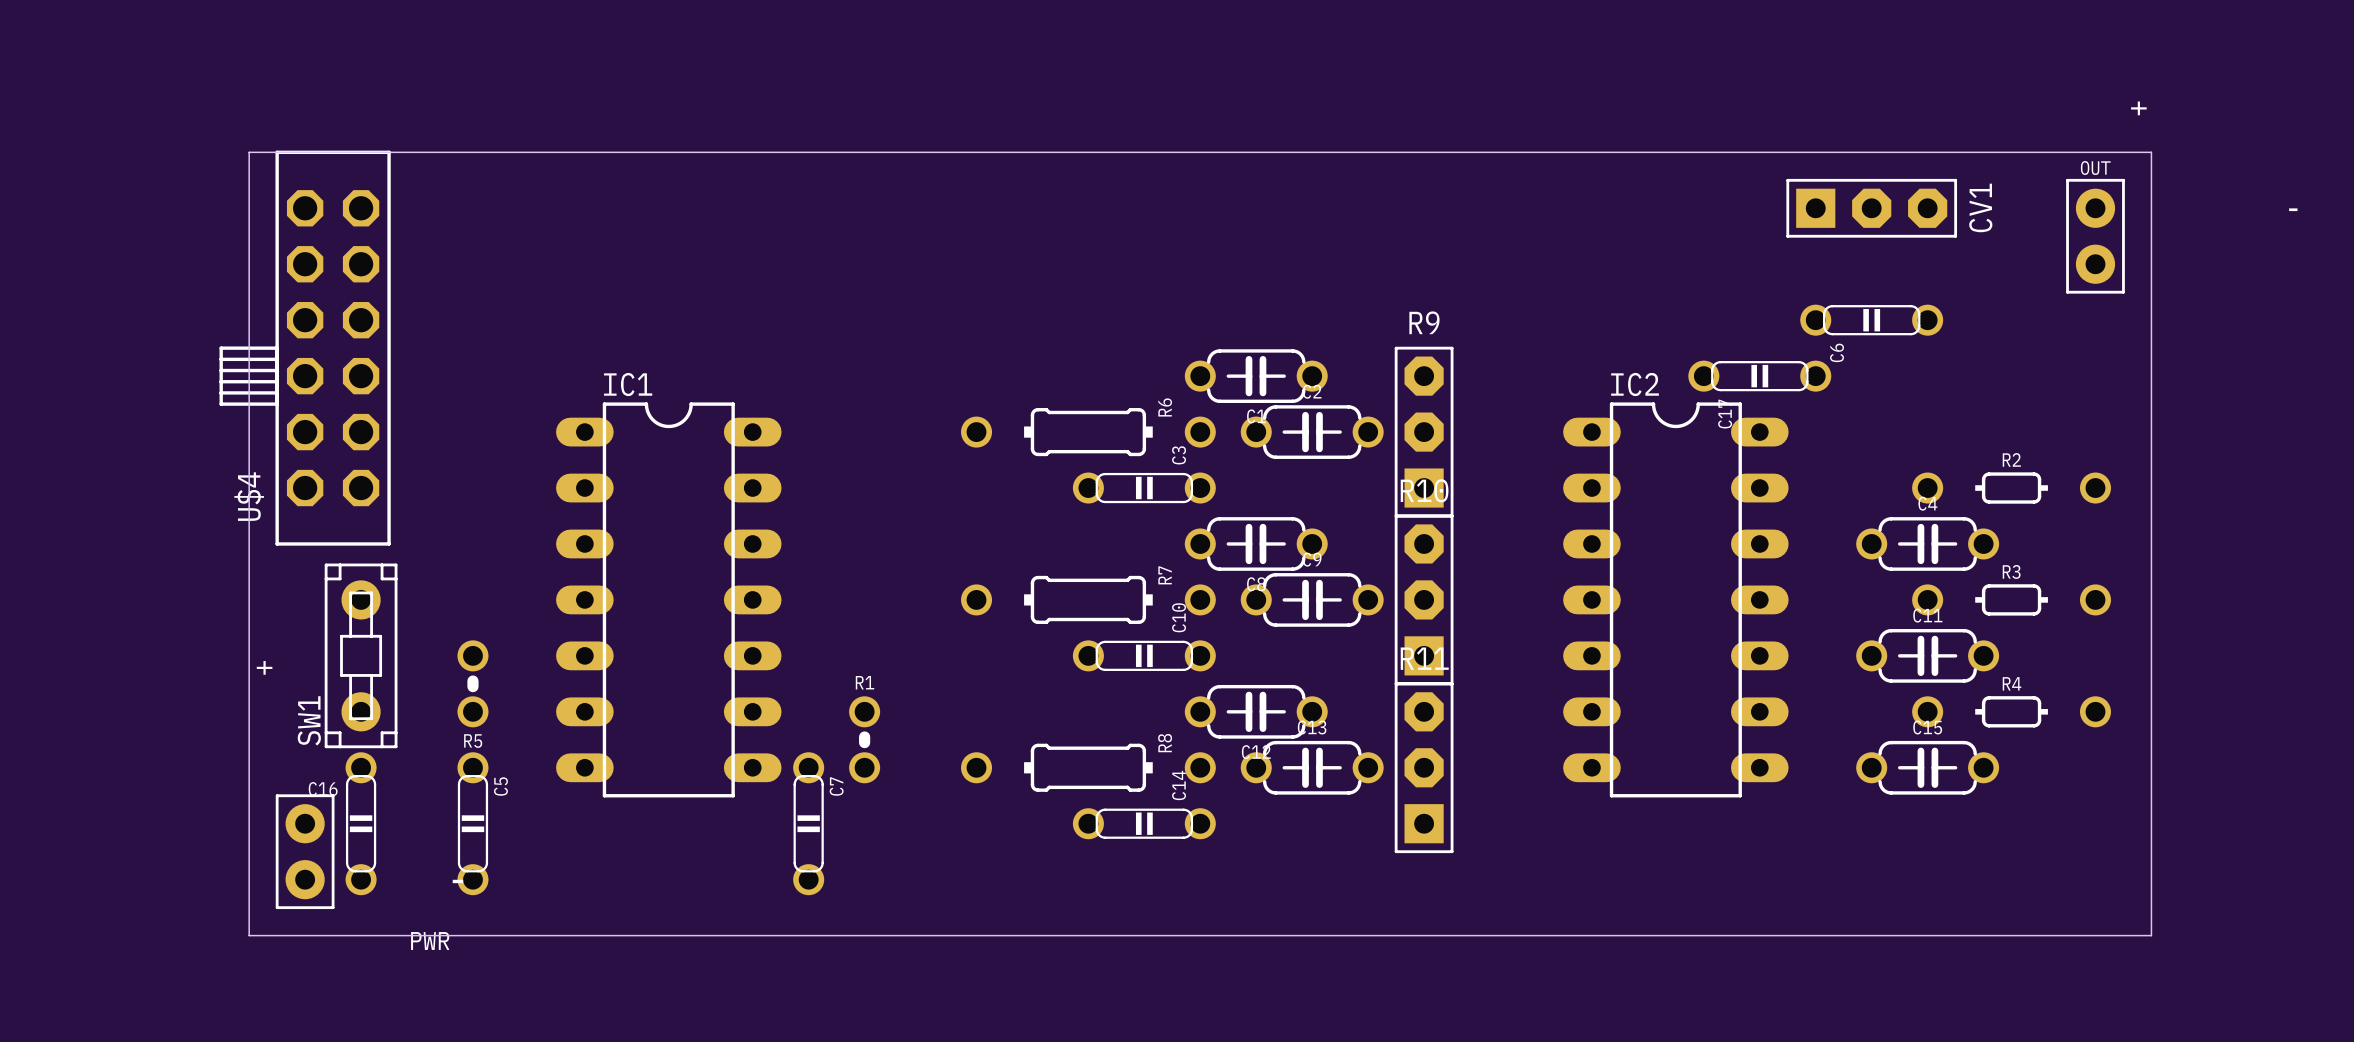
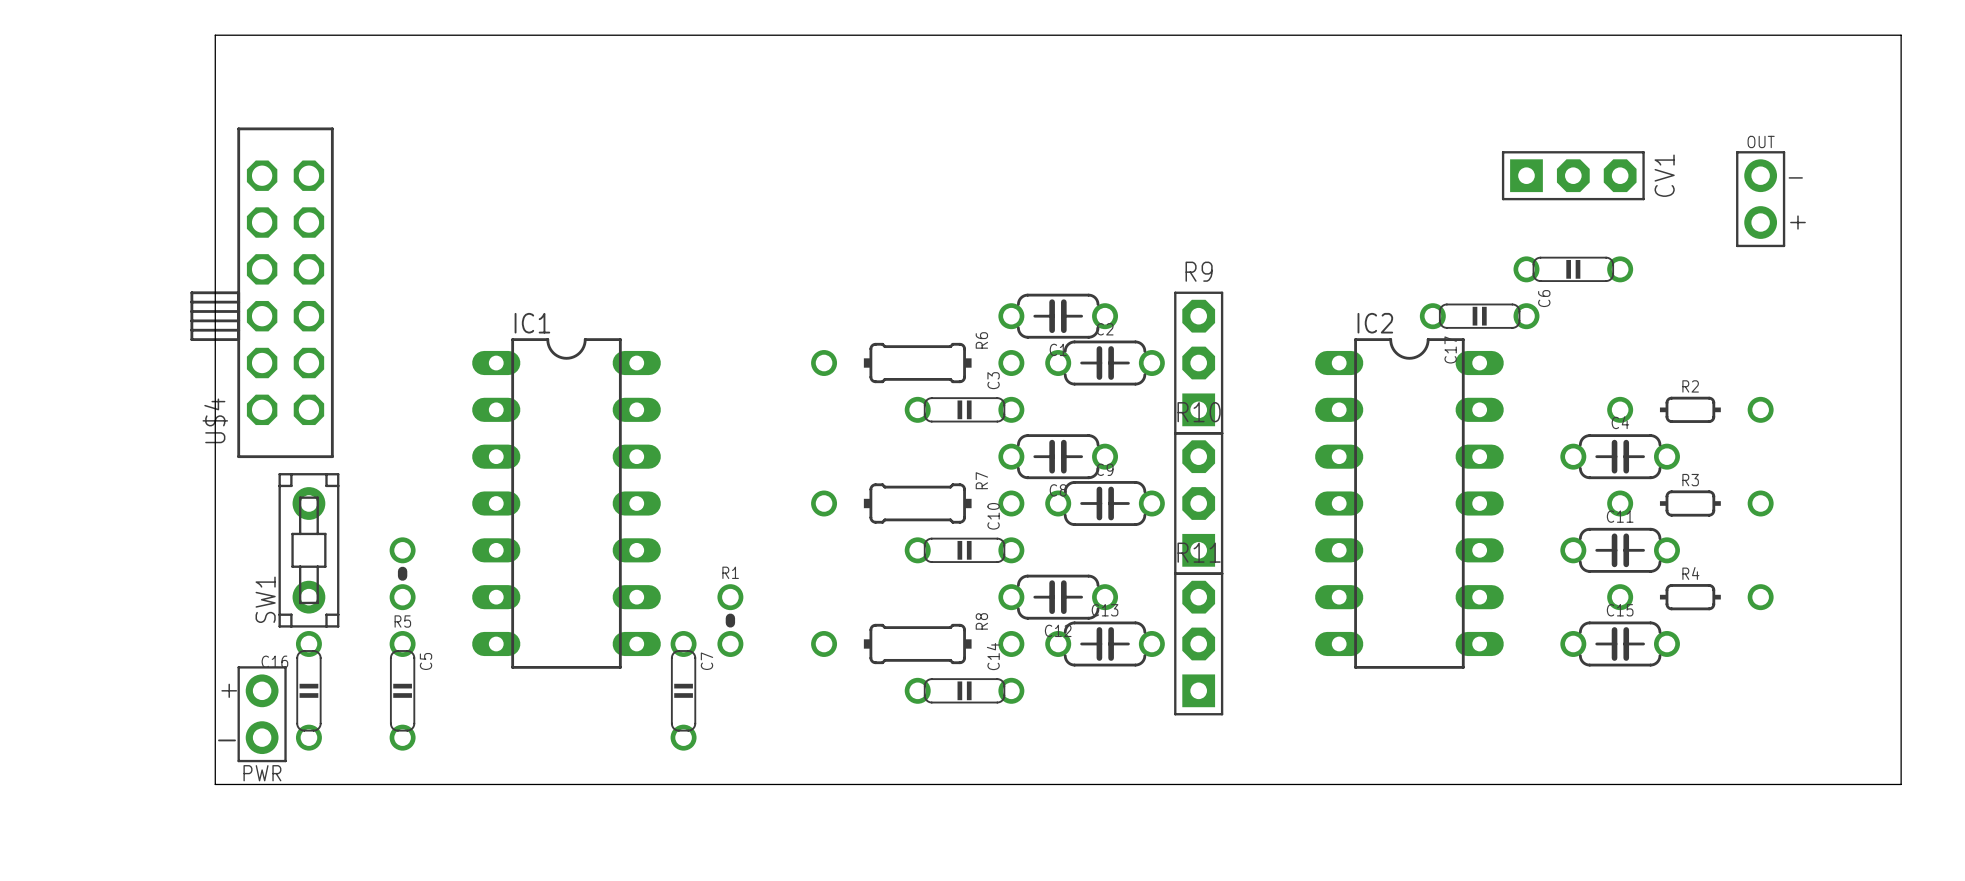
board edge: (249, 152) (2151, 152) (2151, 935) -> (215, 128) (215, 35) (1901, 35) (1901, 784) (1807, 784)
OUT footprint: [2066, 178, 2125, 294] -> [1736, 151, 1786, 248]
part footprint: [275, 794, 335, 910] -> [237, 666, 287, 763]

